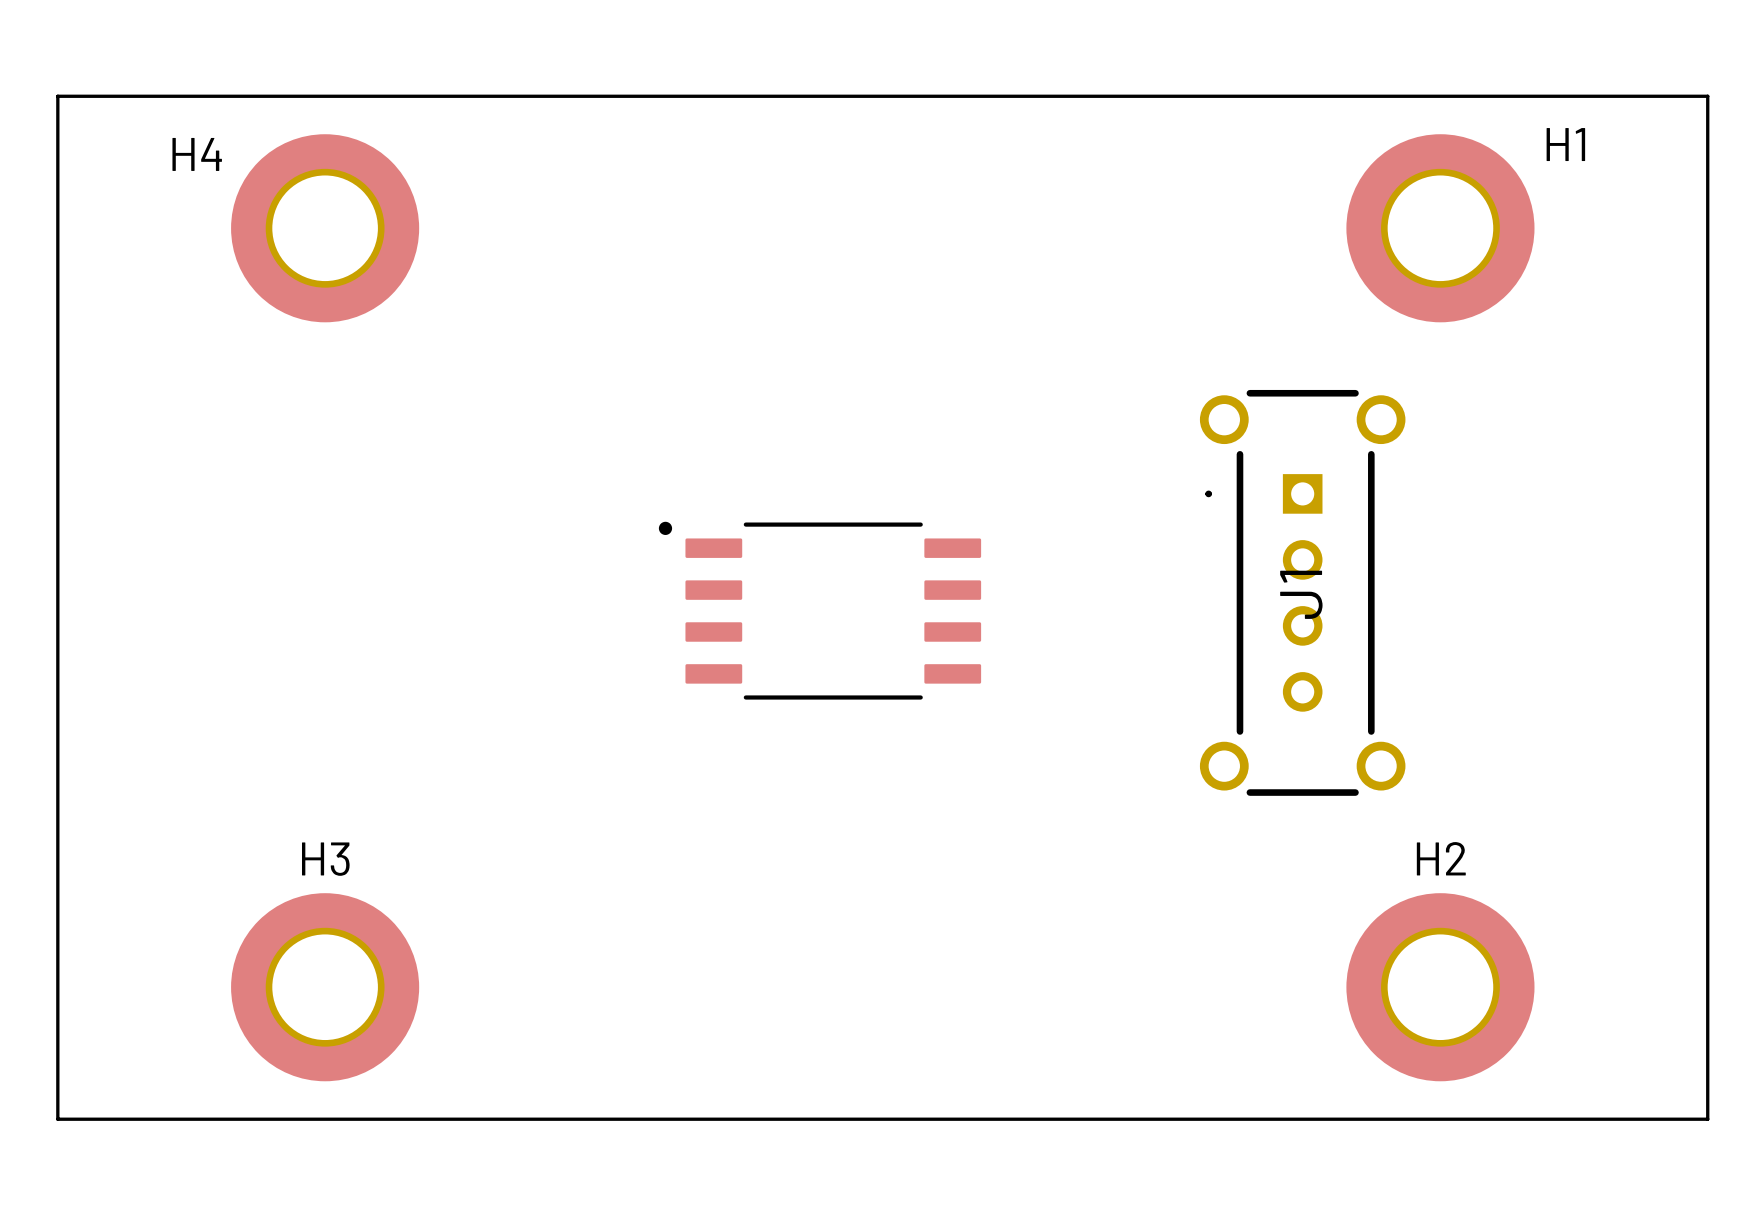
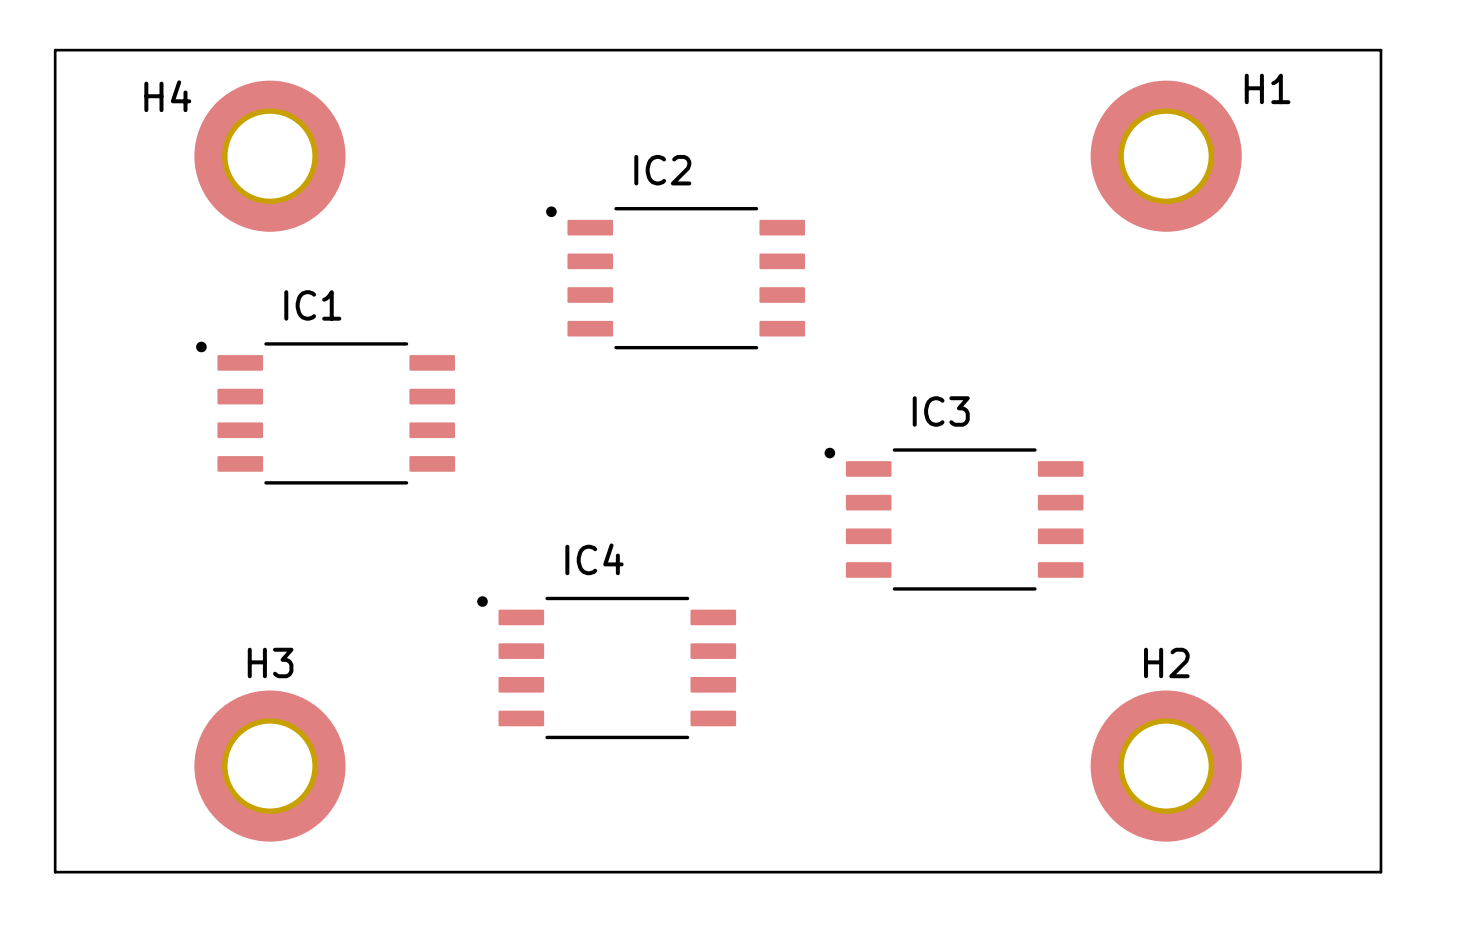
IC2: none -> (675, 277)
IC1: none -> (325, 413)
J1: (1302, 592) -> none
part: (820, 610) -> none
IC3: none -> (954, 519)
IC4: none -> (606, 667)

